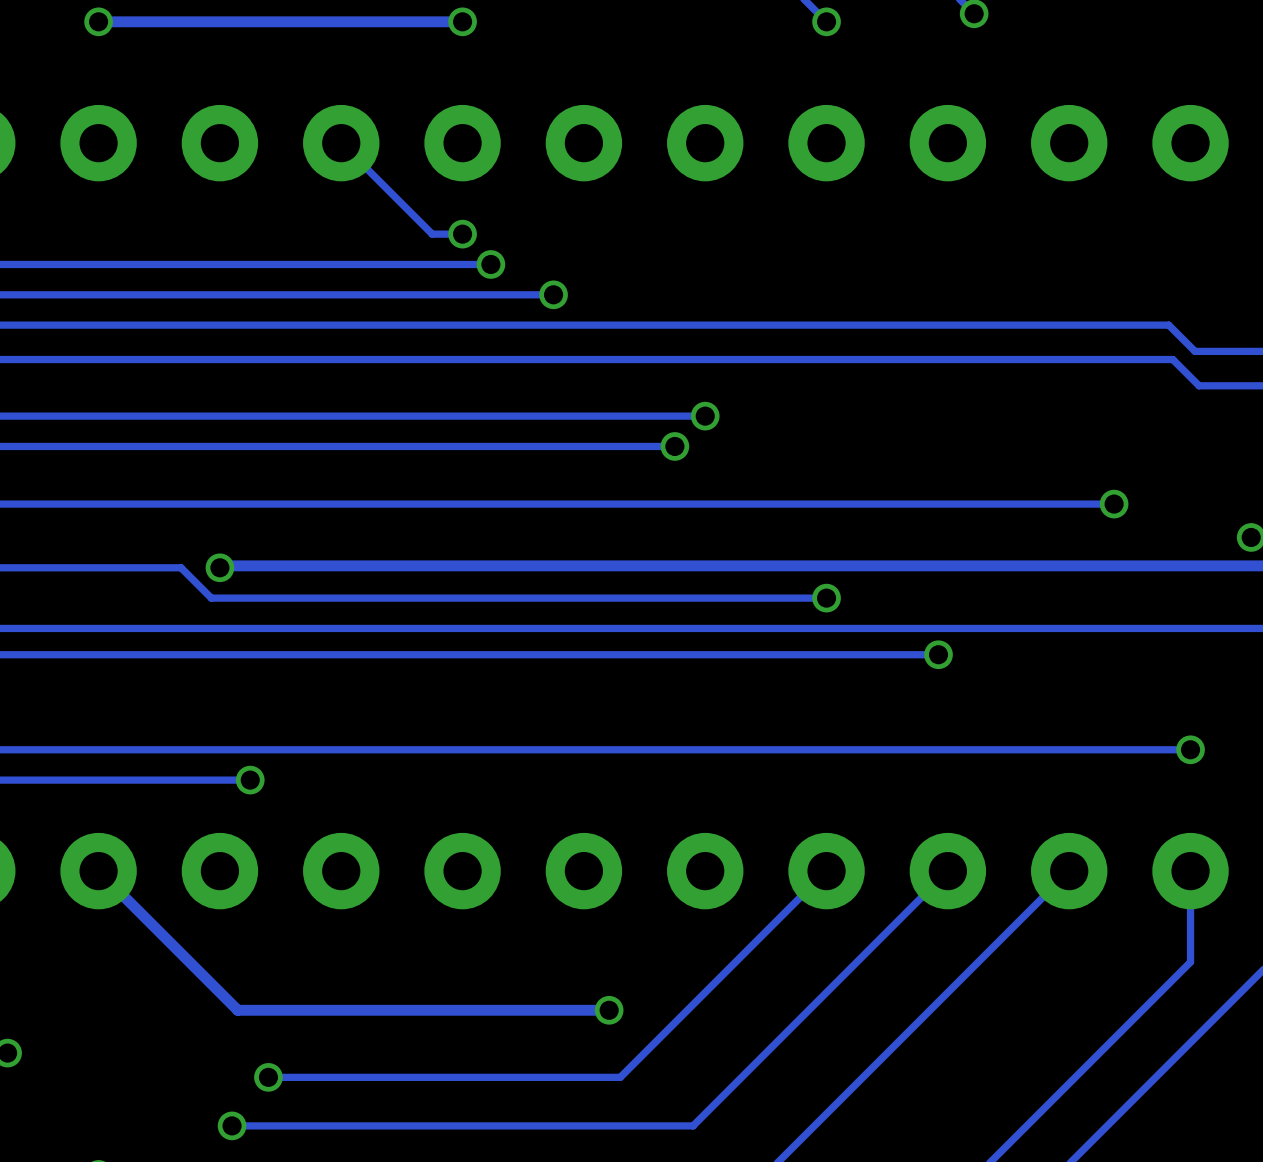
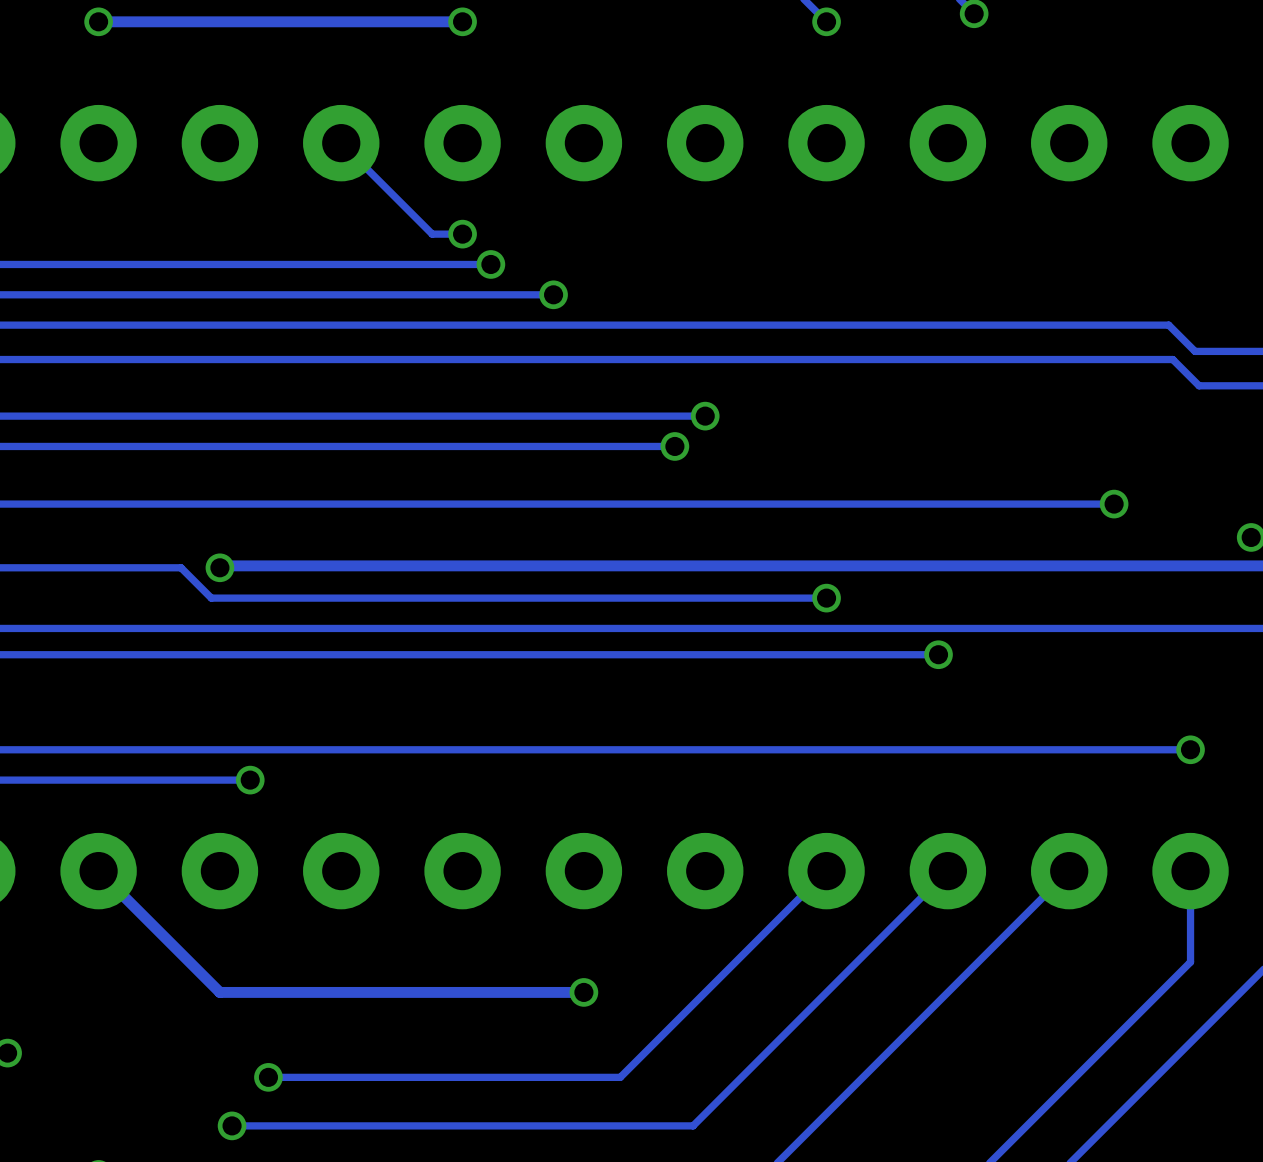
track: (219, 992) (237, 1010) (609, 1010) -> (219, 992) (583, 992)
via position: (609, 1010) -> (583, 992)

